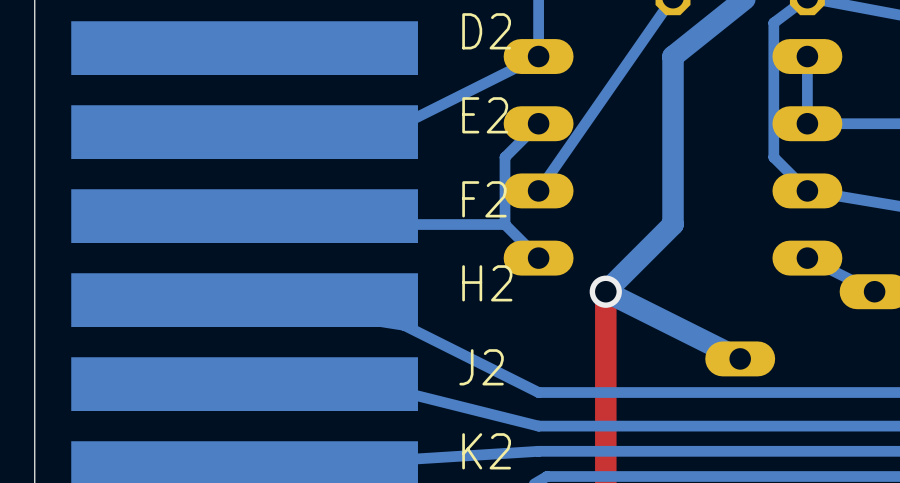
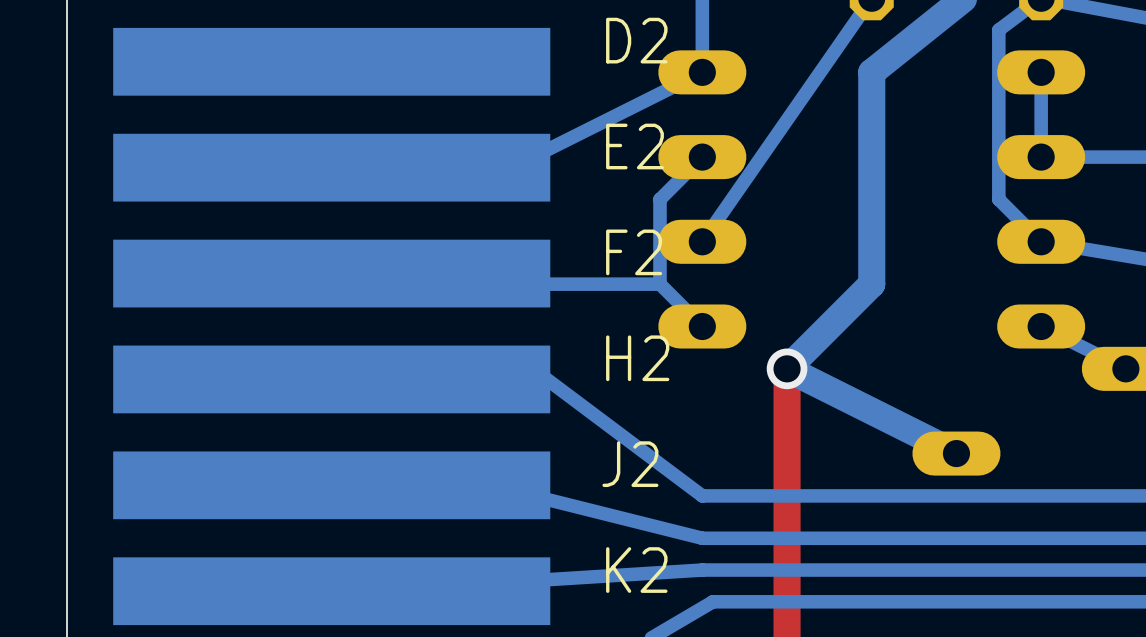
bottom track: (244, 300) (404, 325) (538, 392) -> (331, 379) (532, 368) (702, 495)

